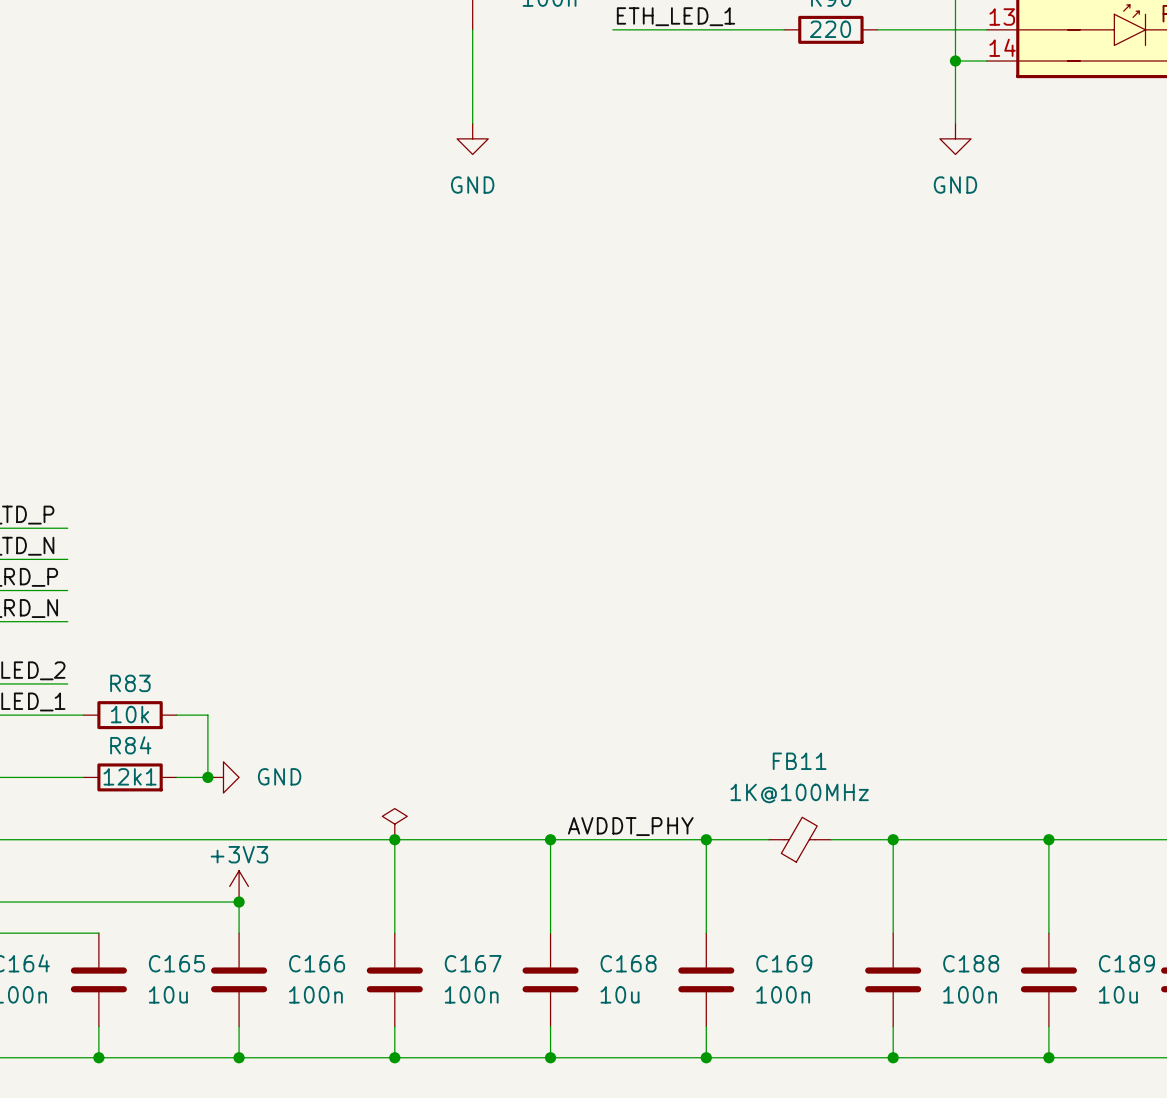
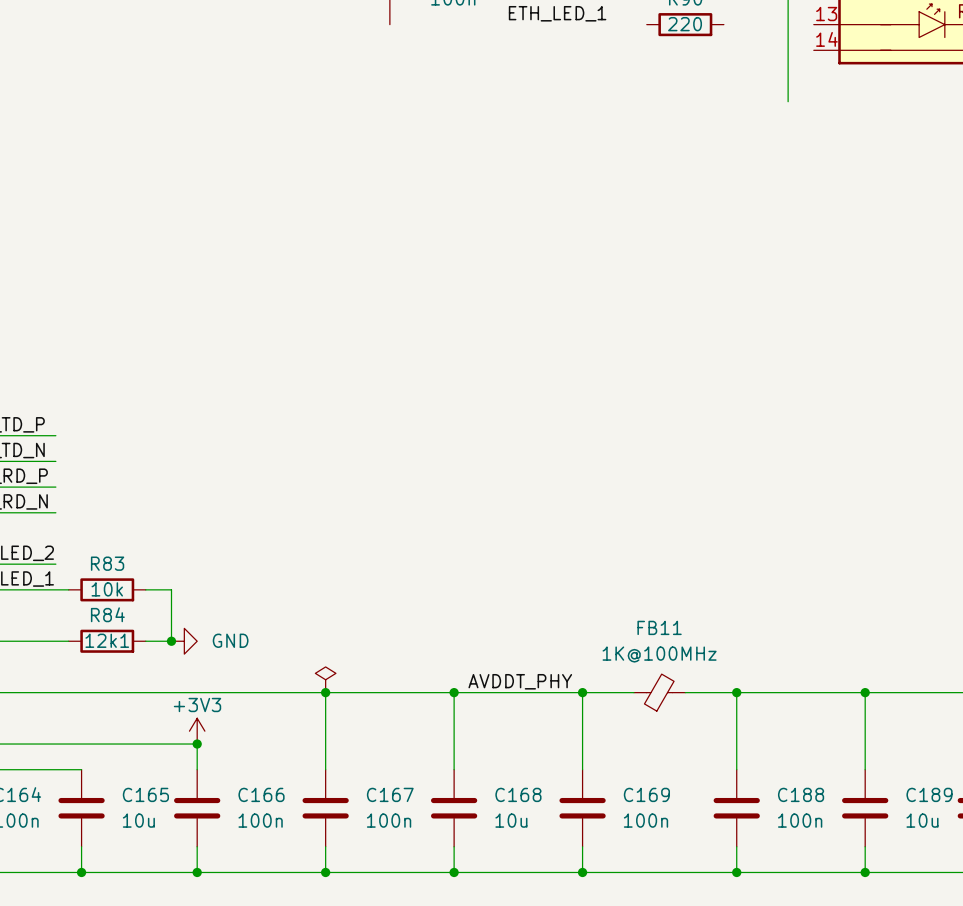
wire: (472, 29) (472, 123) -> none
wire: (612, 29) (784, 29) -> none
wire: (877, 29) (986, 29) -> none
wire: (955, 61) (986, 61) -> none
junction: (955, 61) -> none
power symbol: GND (472, 138) -> none
power symbol: GND (955, 138) -> none

